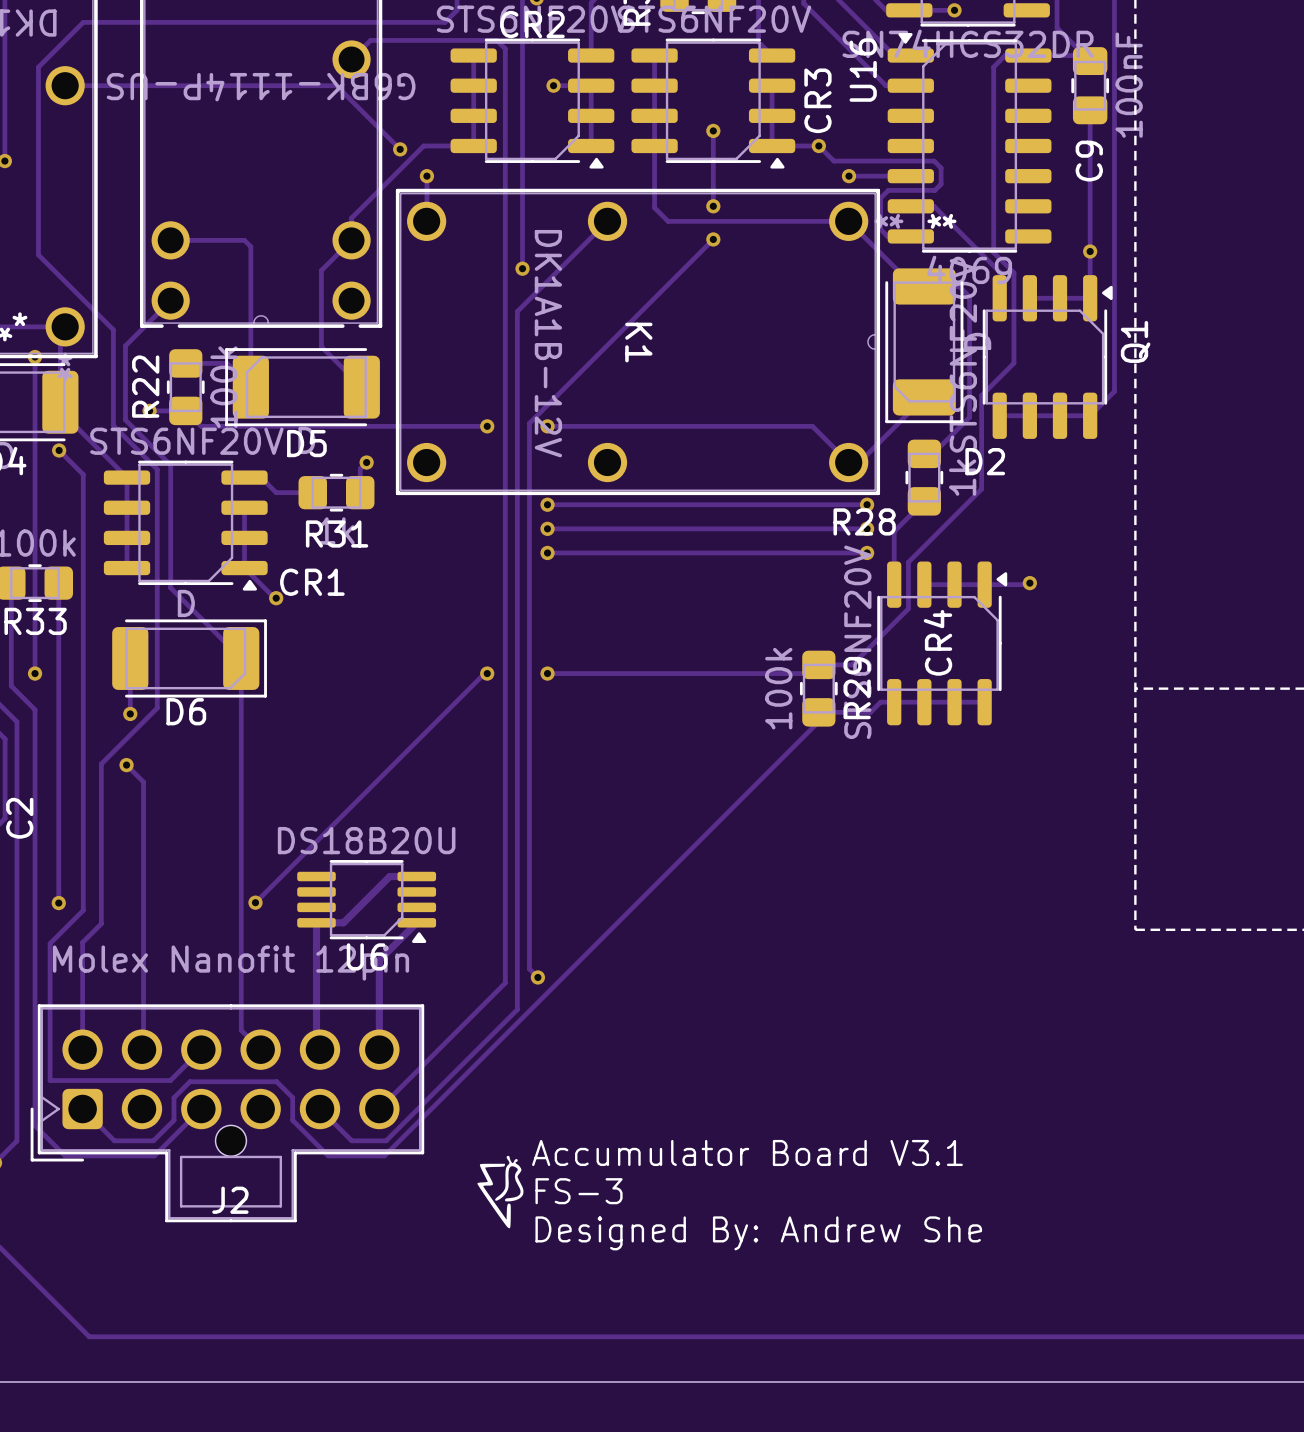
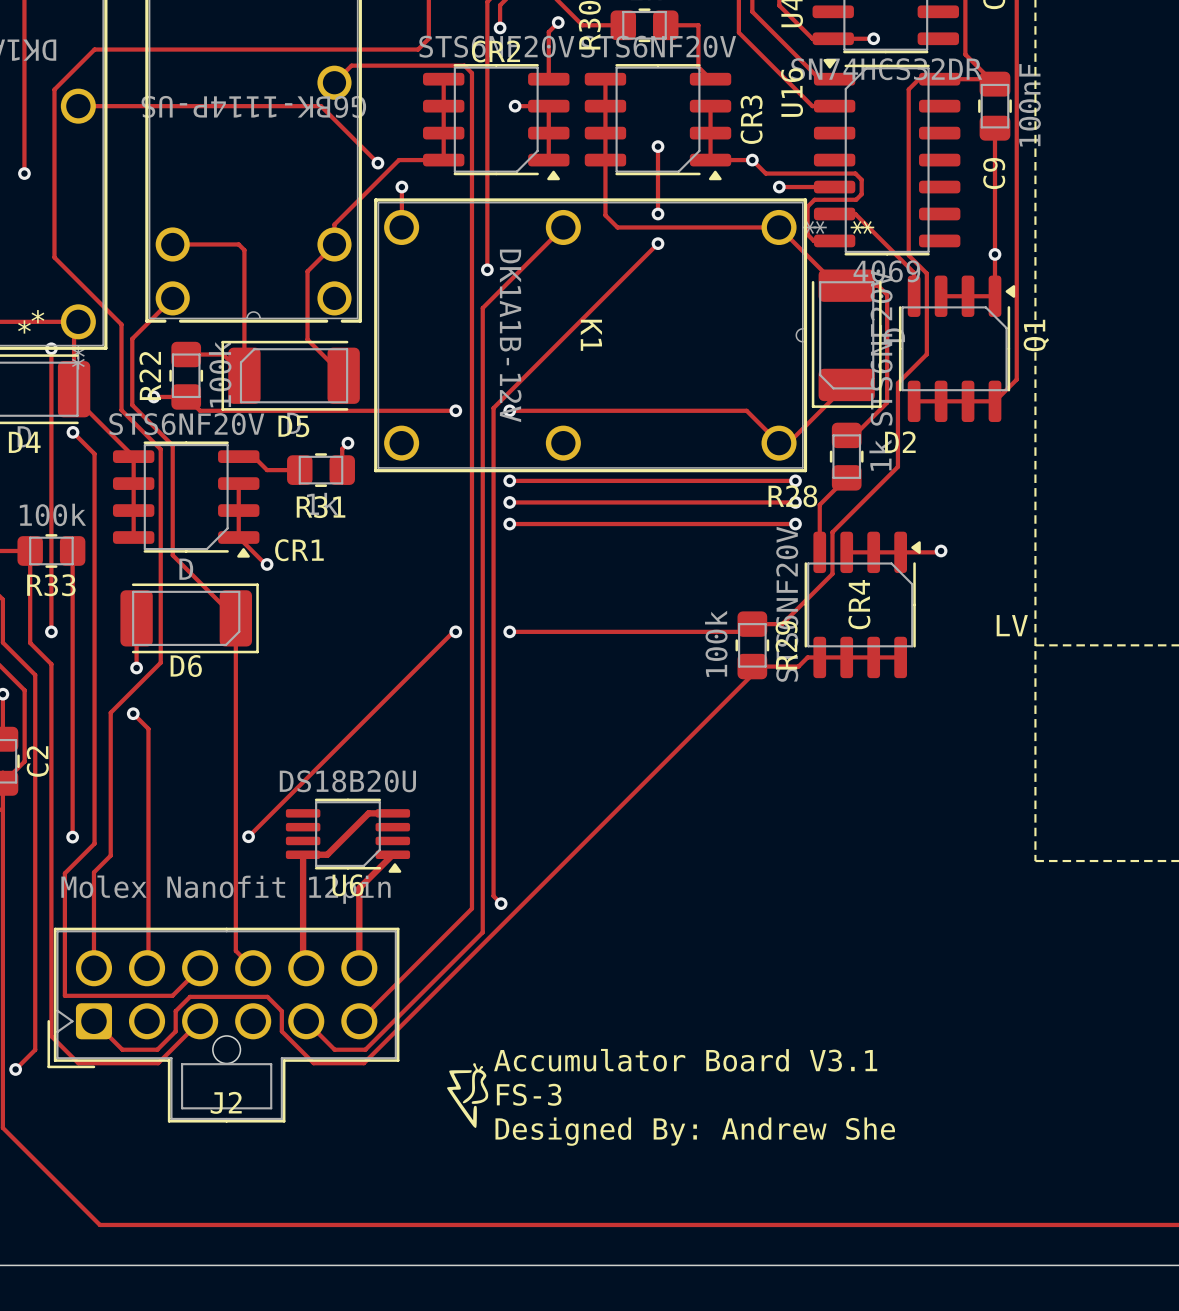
text: none -> LV (1012, 625)

